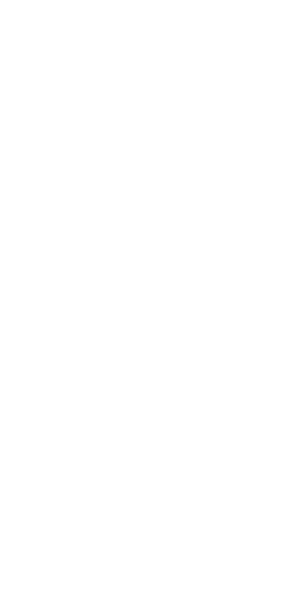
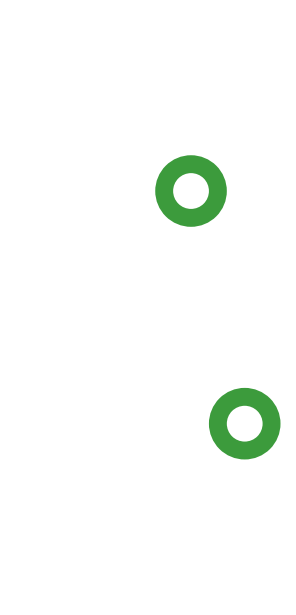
part: none -> (191, 191)
part: none -> (244, 423)

